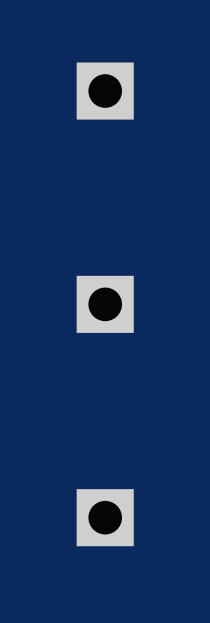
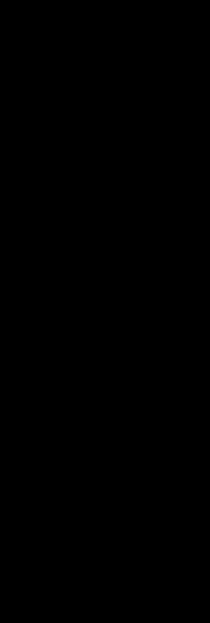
part: (105, 91) -> none
part: (105, 304) -> none
part: (105, 517) -> none

